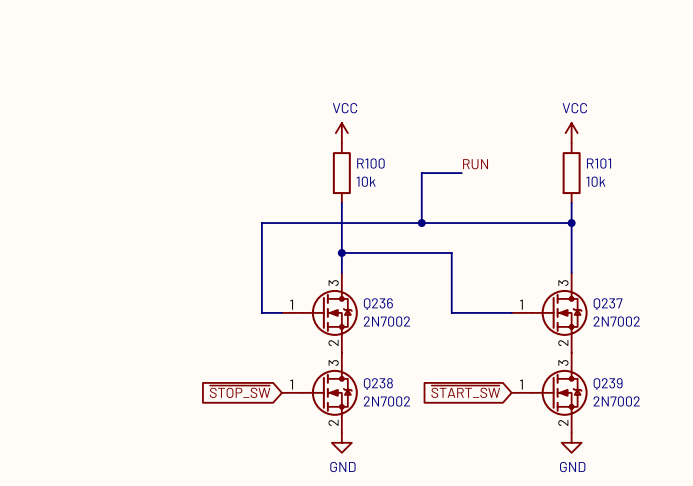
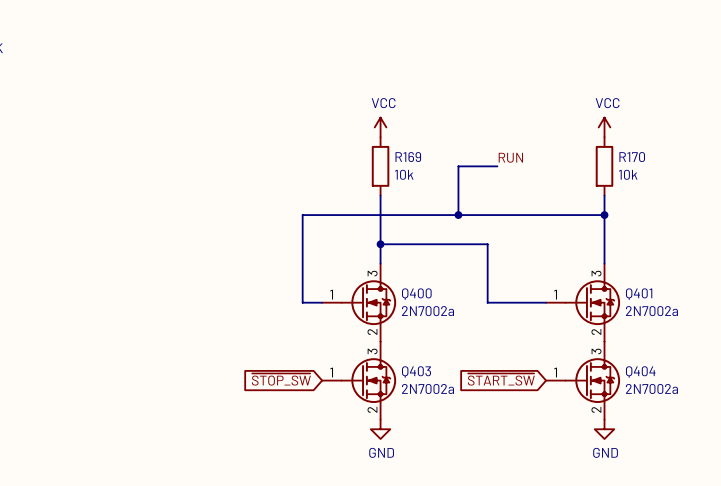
R100 name: R100 (370, 163) -> R169 (408, 157)
R101 name: R101 (599, 163) -> R170 (632, 157)
Q236 name: Q236 (378, 304) -> Q400 (416, 294)
Q237 name: Q237 (608, 304) -> Q401 (639, 294)
Q236 value: 2N7002 (386, 321) -> 2N7002a (427, 311)
Q237 value: 2N7002 (616, 321) -> 2N7002a (651, 311)
Q238 name: Q238 (378, 384) -> Q403 (416, 371)
Q239 name: Q239 (608, 384) -> Q404 (640, 371)
Q238 value: 2N7002 (386, 401) -> 2N7002a (427, 388)
Q239 value: 2N7002 (616, 401) -> 2N7002a (651, 388)

